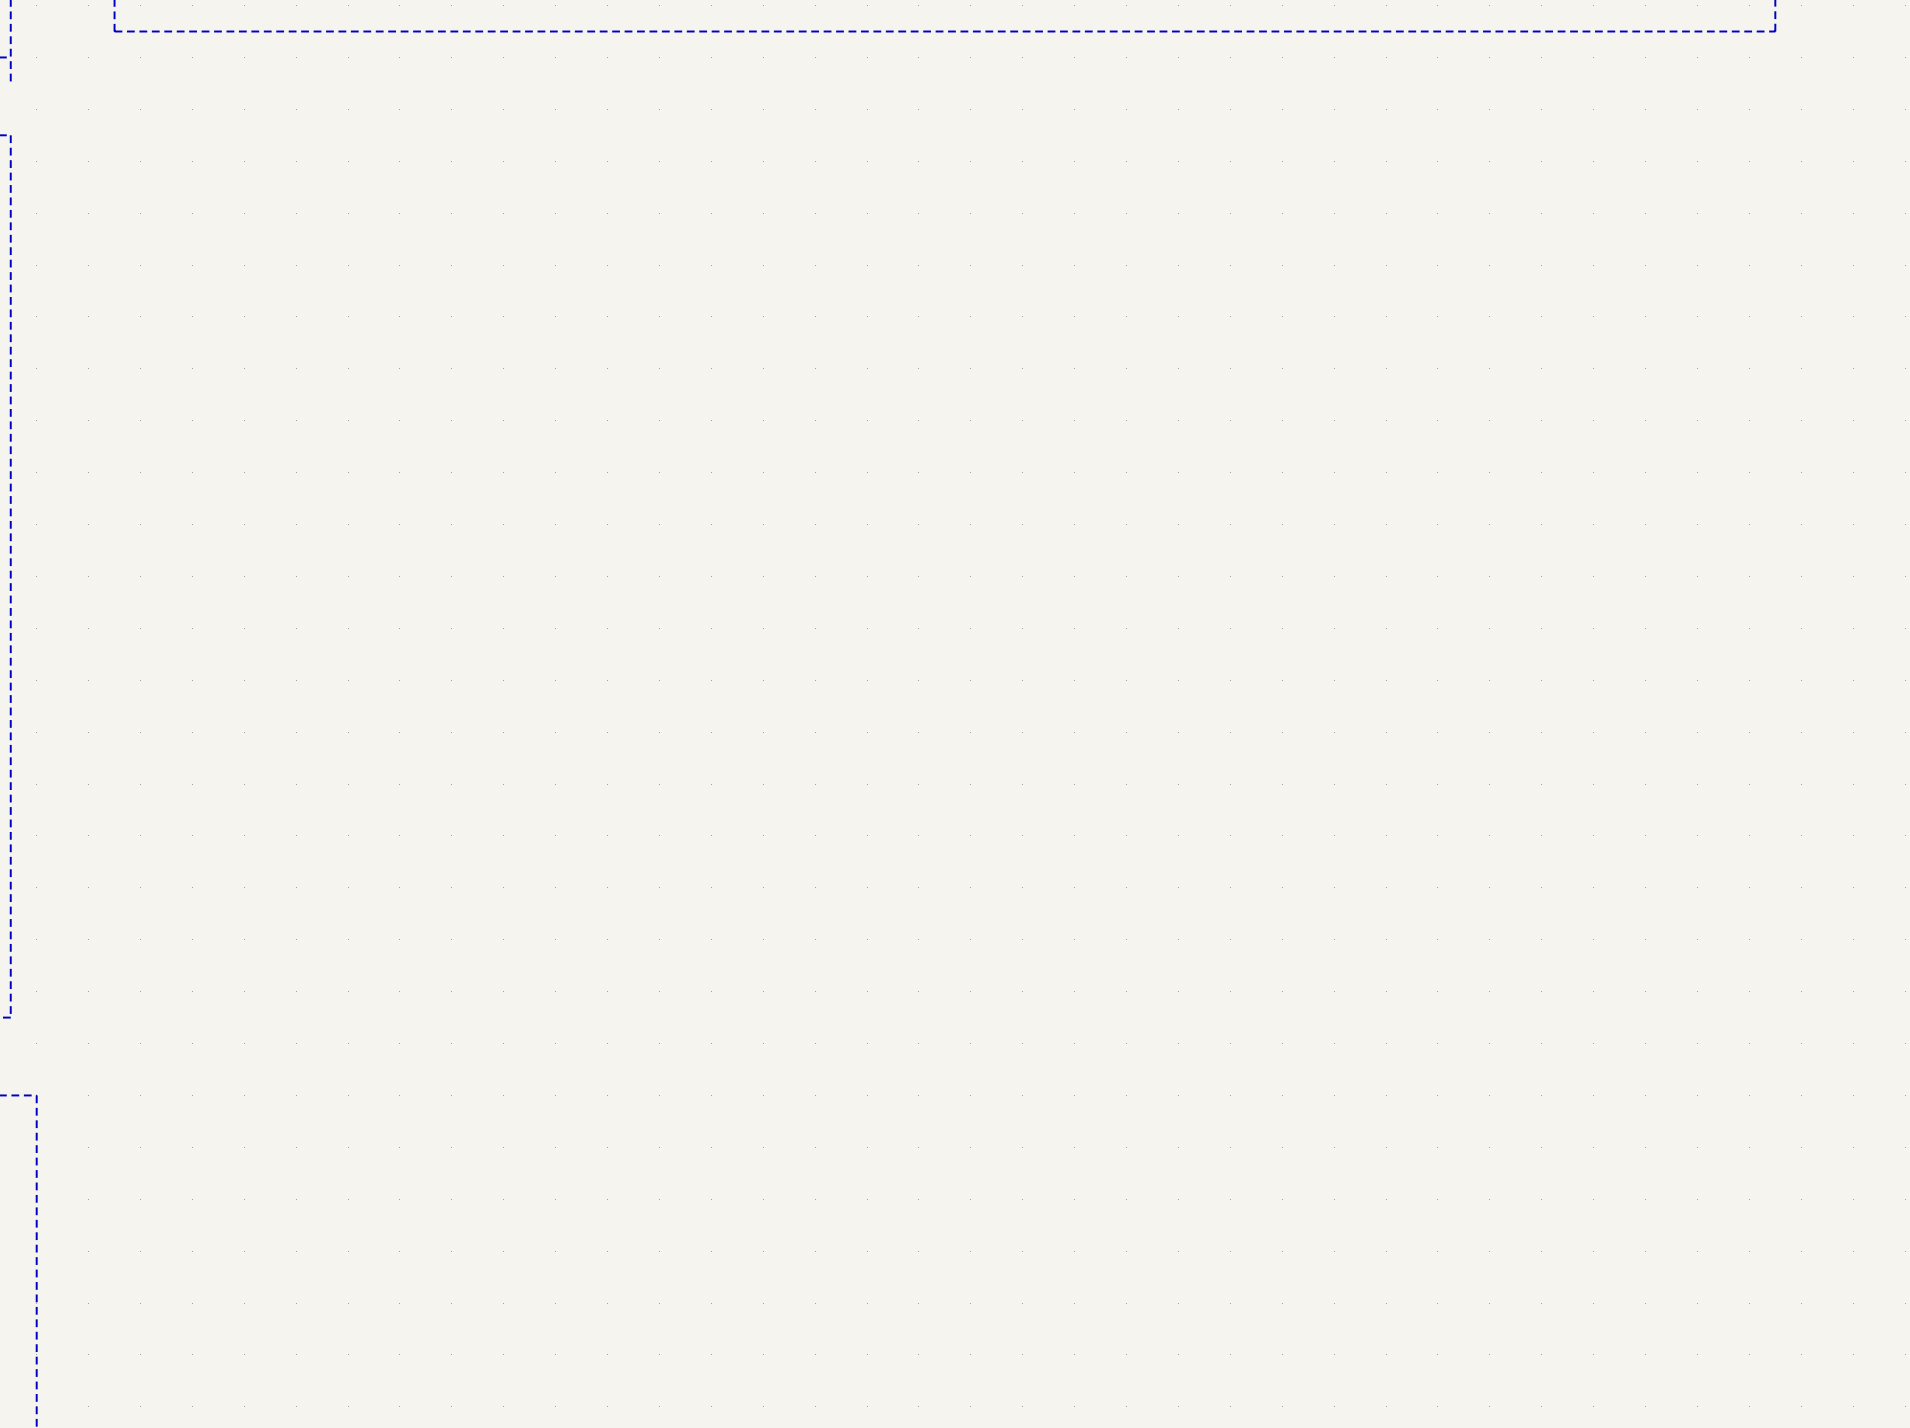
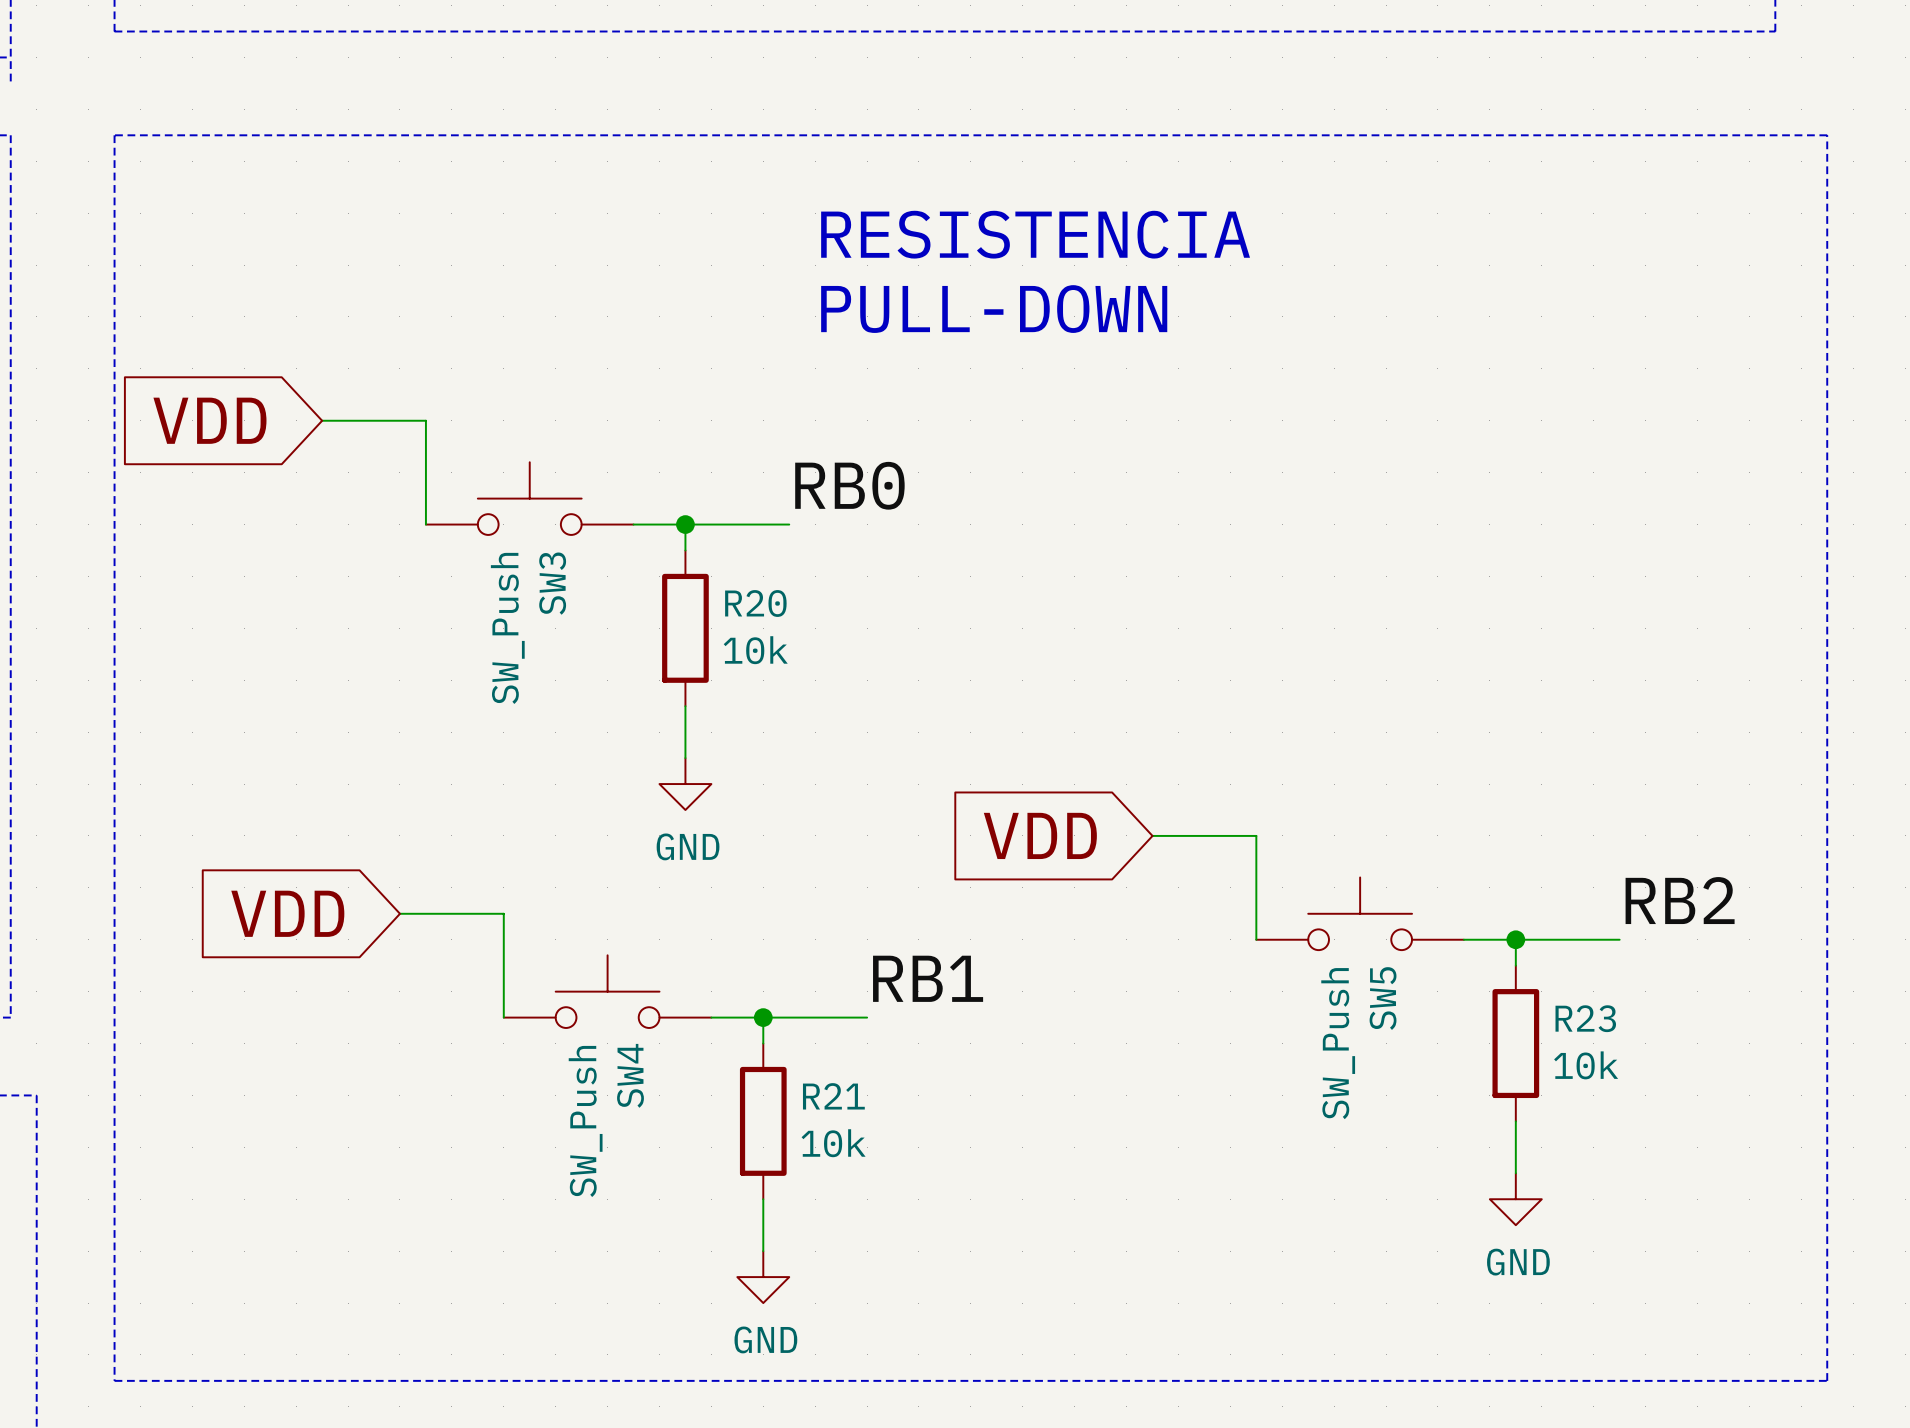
line: none -> (114, 135) (1827, 135) (1827, 1380) (114, 1380) (114, 135)
text: none -> RESISTENCIA (1035, 234)
text: none -> PULL-DOWN (994, 309)
global label: none -> VDD (209, 420)
wire: none -> (322, 420) (425, 420) (425, 524)
label: none -> RB0 (849, 485)
SW3: none -> SW_Push (529, 498)
wire: none -> (633, 524) (789, 524)
wire: none -> (685, 524) (685, 550)
junction: none -> (685, 524)
R20: none -> 10k (685, 628)
wire: none -> (685, 706) (685, 758)
power symbol: none -> GND (685, 784)
global label: none -> VDD (1040, 835)
wire: none -> (1152, 835) (1256, 835) (1256, 939)
label: none -> RB2 (1680, 900)
global label: none -> VDD (287, 913)
wire: none -> (399, 913) (503, 913) (503, 1017)
SW5: none -> SW_Push (1360, 913)
wire: none -> (1463, 939) (1619, 939)
wire: none -> (1515, 939) (1515, 965)
junction: none -> (1515, 939)
label: none -> RB1 (928, 978)
SW4: none -> SW_Push (607, 991)
wire: none -> (711, 1017) (867, 1017)
wire: none -> (763, 1017) (763, 1043)
junction: none -> (763, 1017)
R23: none -> 10k (1515, 1043)
R21: none -> 10k (763, 1121)
wire: none -> (1515, 1121) (1515, 1173)
wire: none -> (763, 1199) (763, 1251)
power symbol: none -> GND (1515, 1199)
power symbol: none -> GND (763, 1277)

